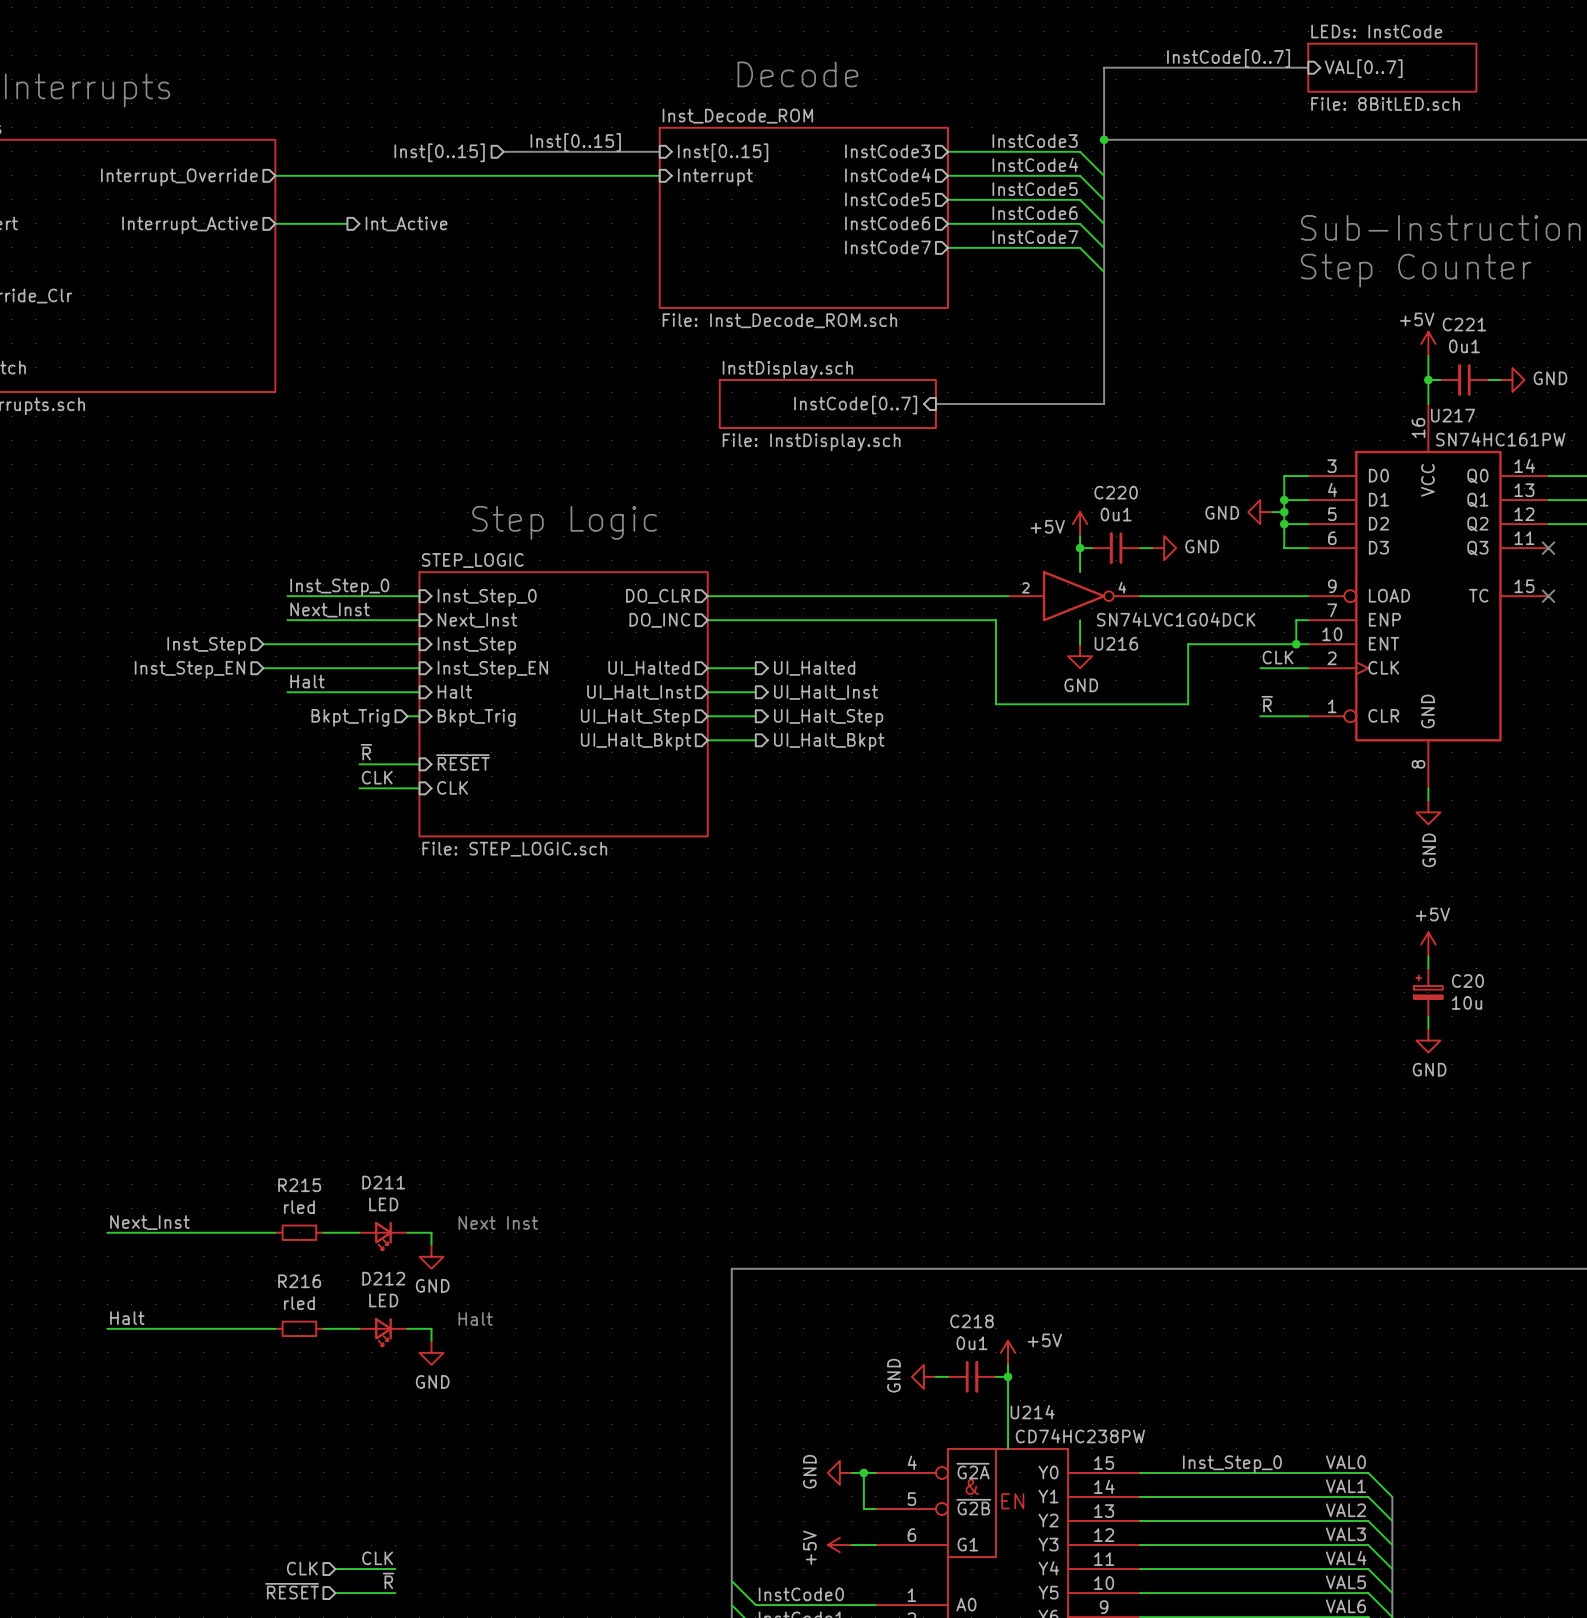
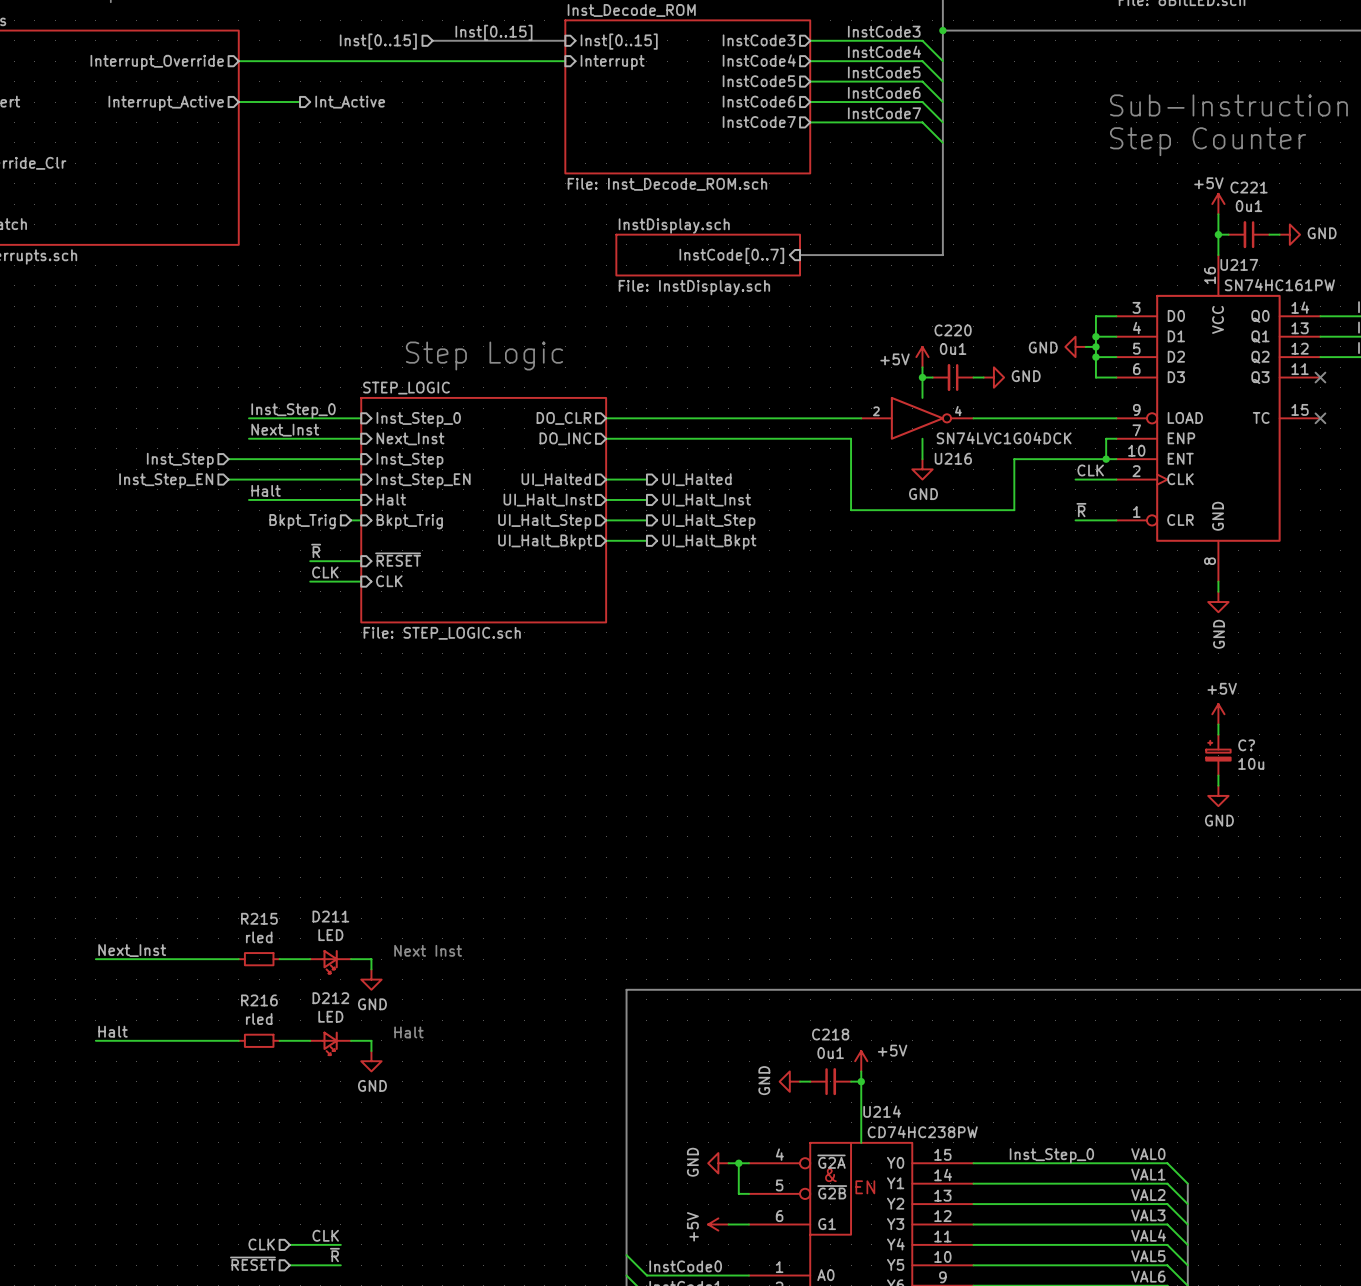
C20 name: C20 (1467, 981) -> C? (1246, 745)

